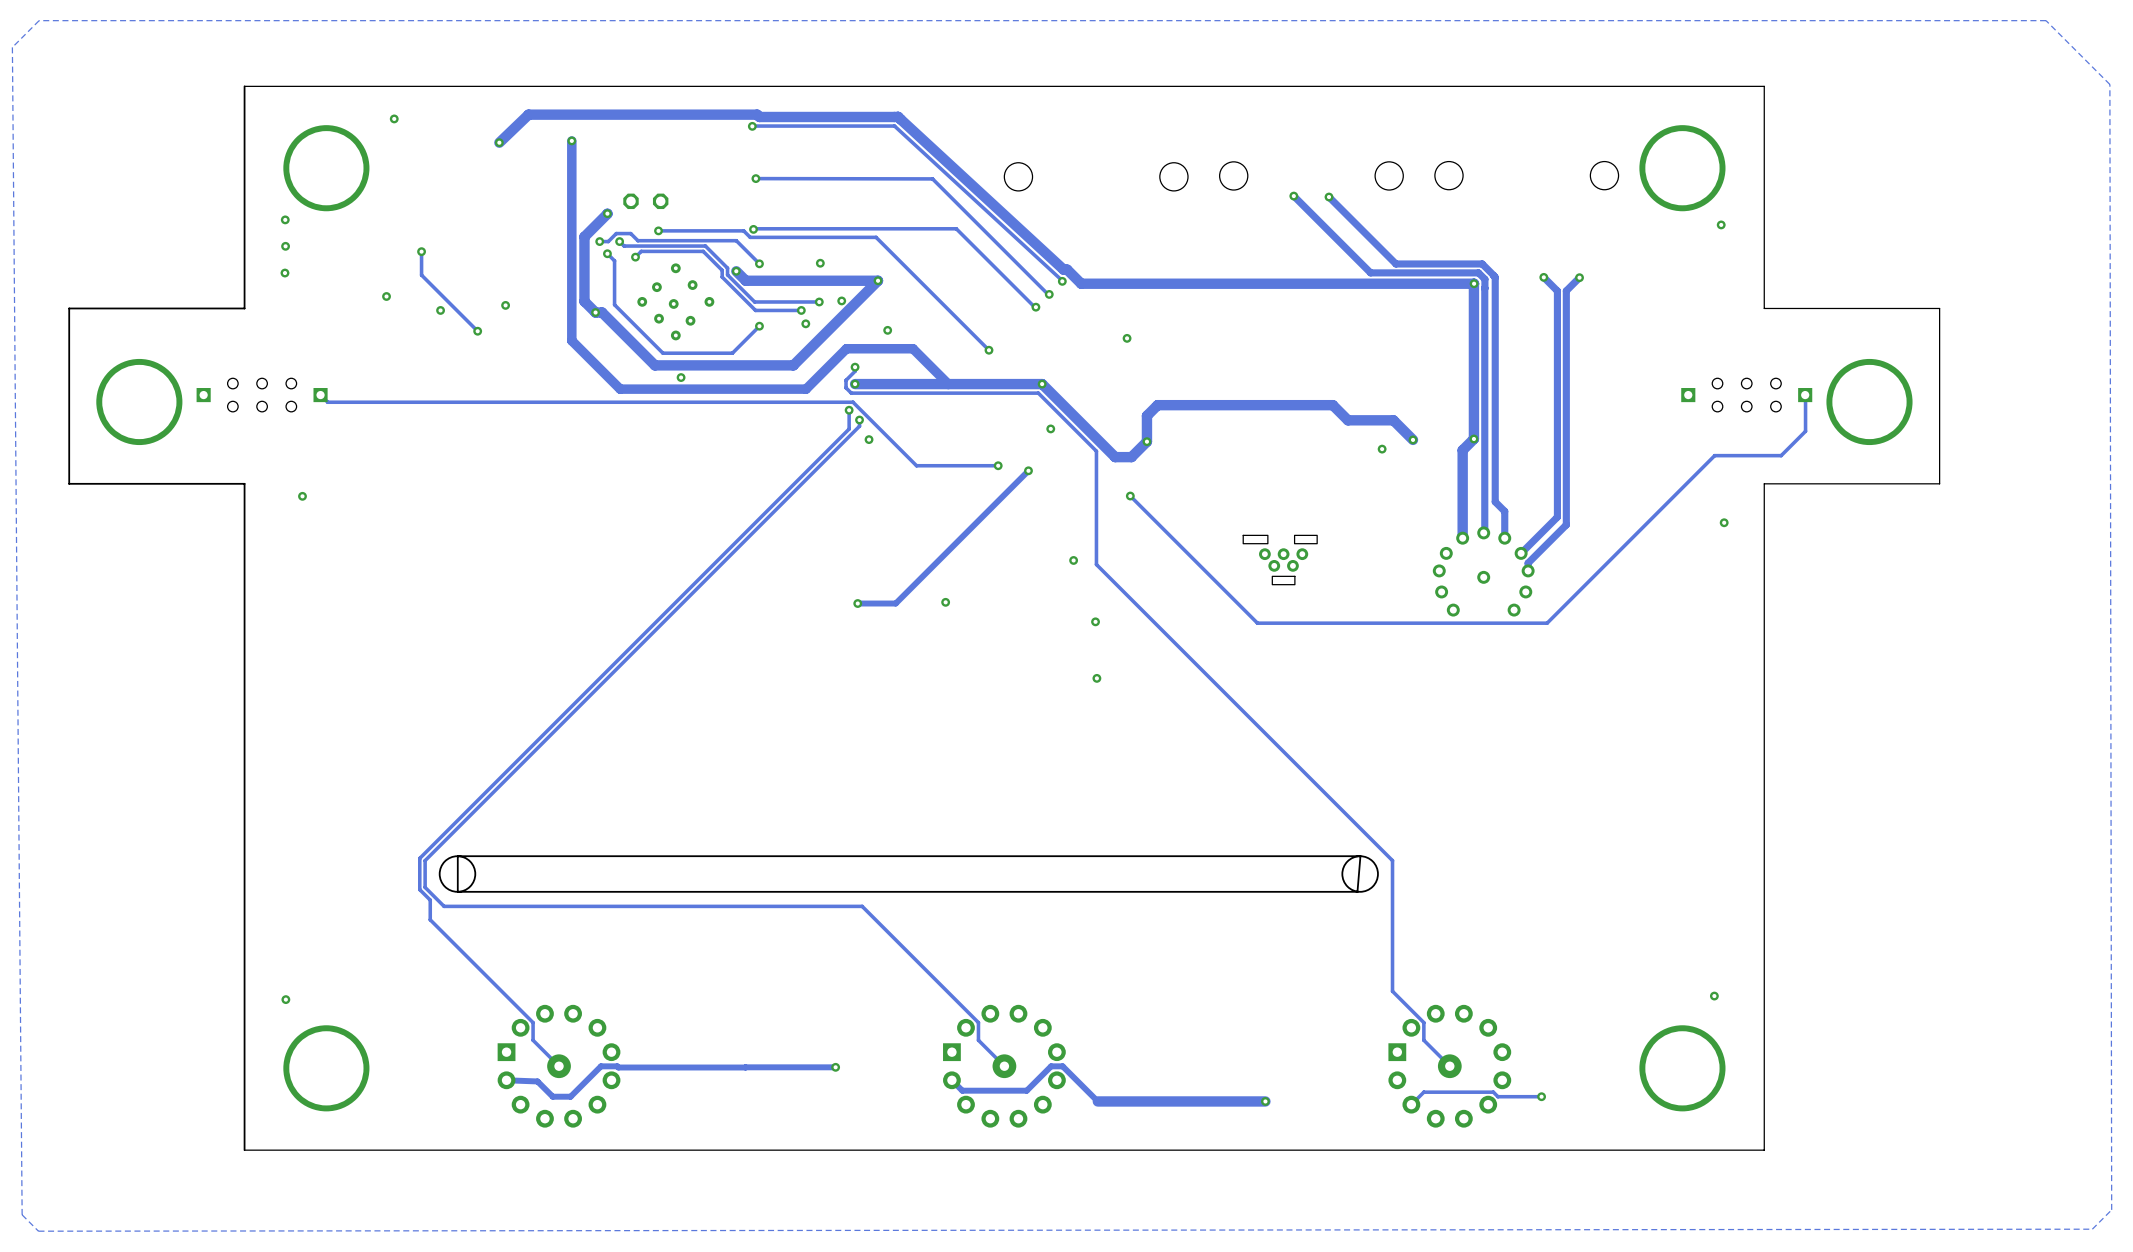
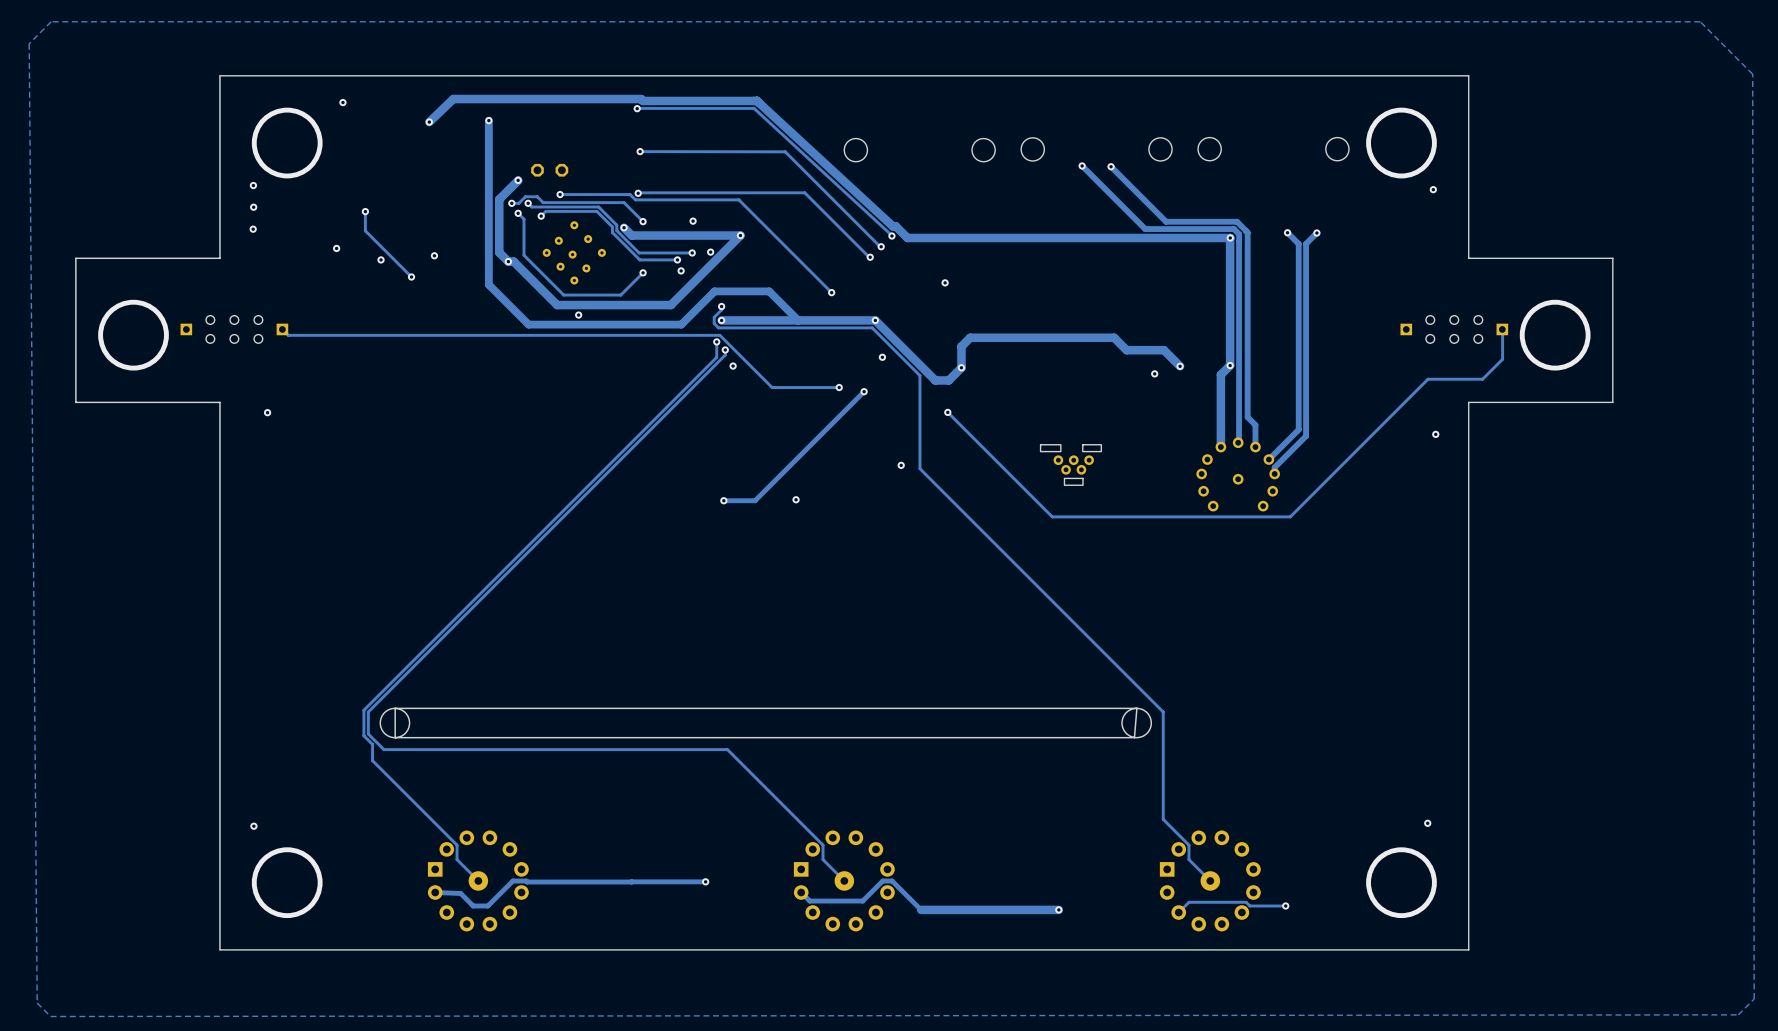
via: (887, 330) -> none
via: (1095, 621) -> none
via: (1096, 678) -> none

